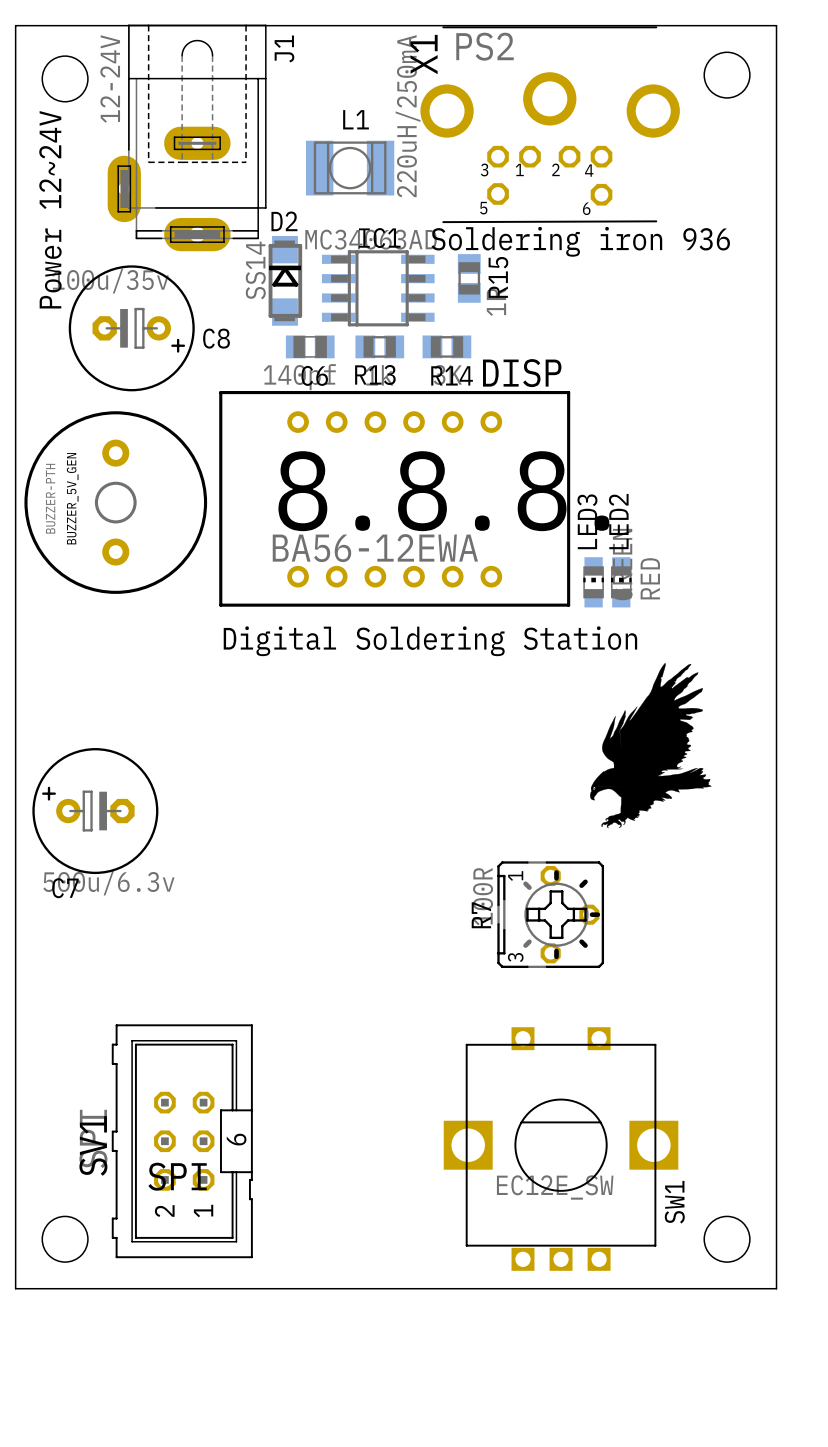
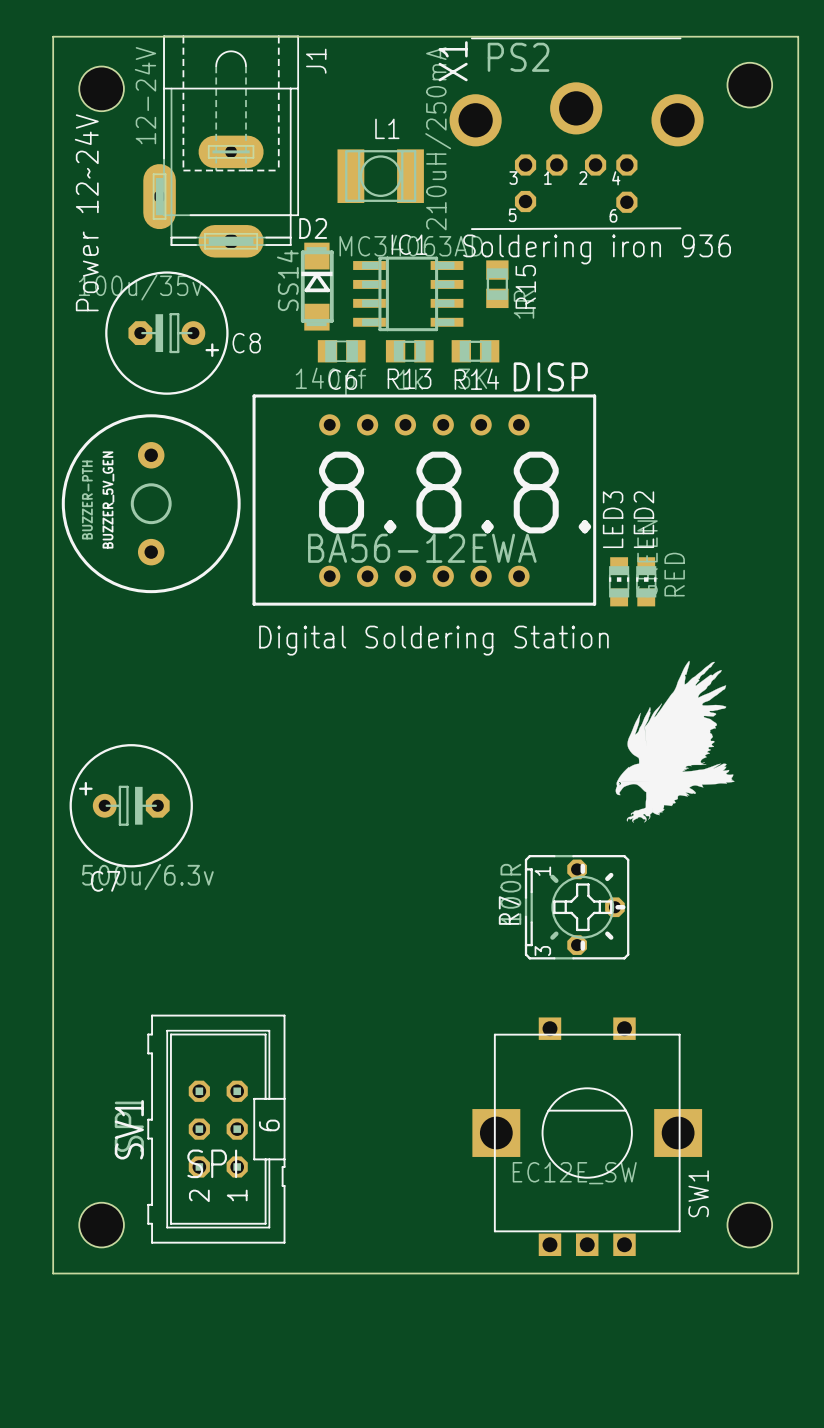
L1 value: 220uH/250mA (408, 116) -> 210uH/250mA (438, 138)

